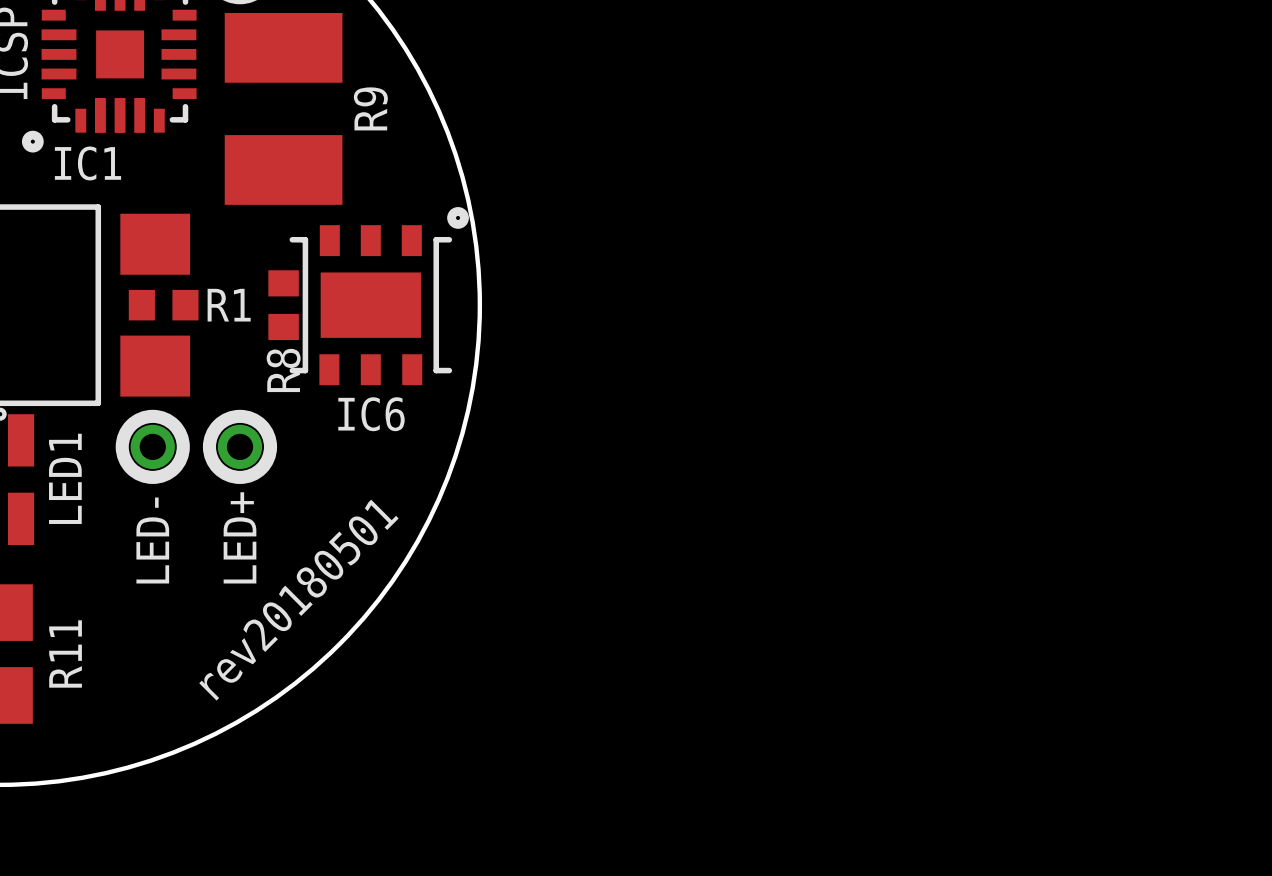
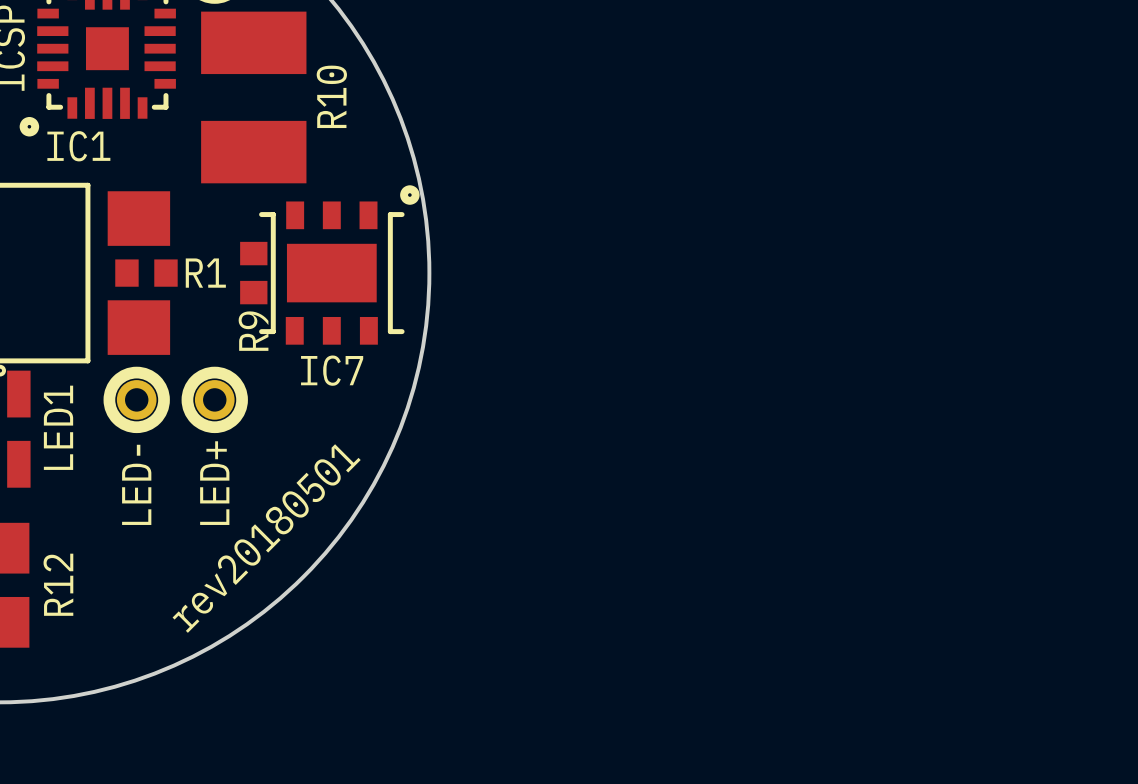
R9 name: R9 (370, 108) -> R10 (331, 96)
R8 name: R8 (283, 370) -> R9 (253, 331)
IC6 name: IC6 (371, 414) -> IC7 (332, 370)
R11 name: R11 (65, 654) -> R12 (58, 584)

